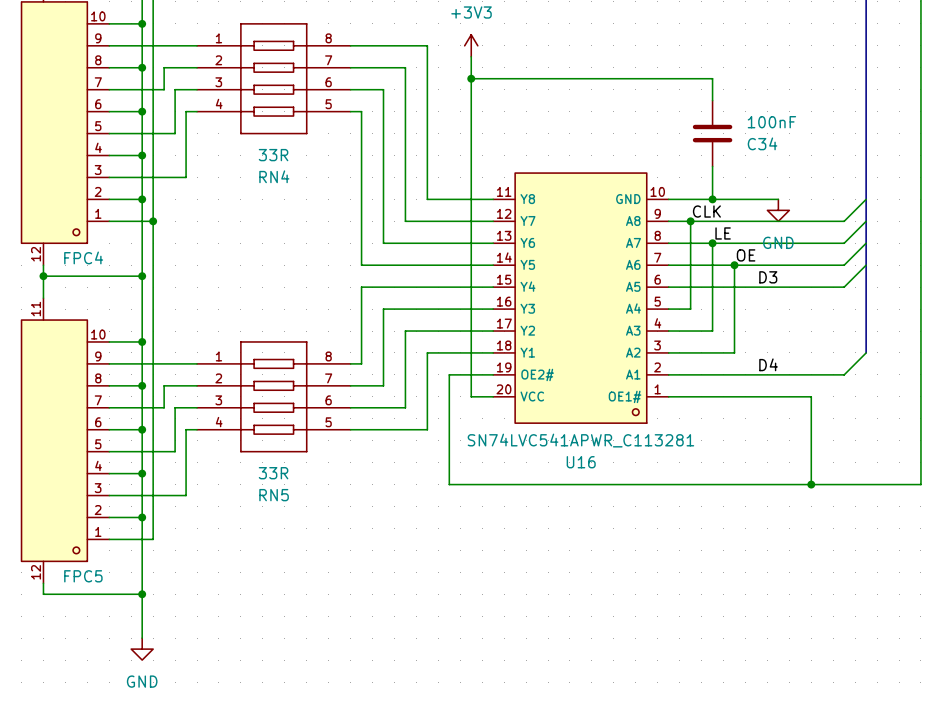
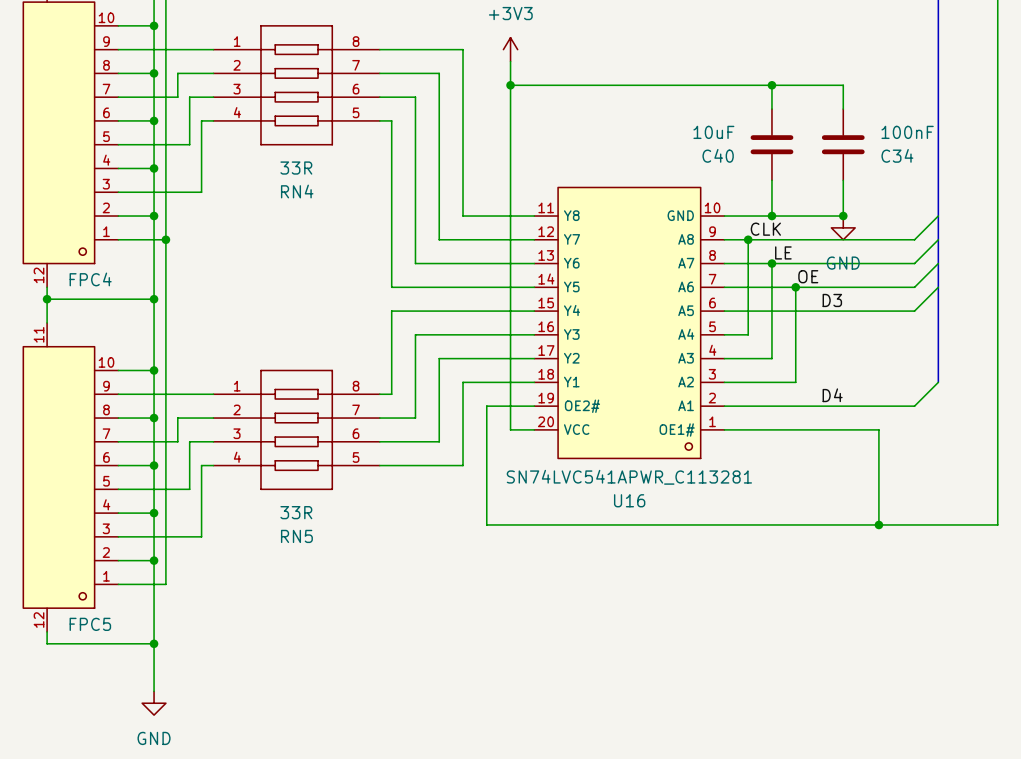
wire: none -> (771, 85) (843, 85) (843, 109)
junction: none -> (771, 85)
C34 value: 100nF (771, 122) -> 10uF (713, 132)
C34: none -> 100nF (843, 144)
C34 name: C34 (762, 143) -> C40 (718, 155)
wire: none -> (843, 180) (843, 216)
junction: none -> (843, 216)

